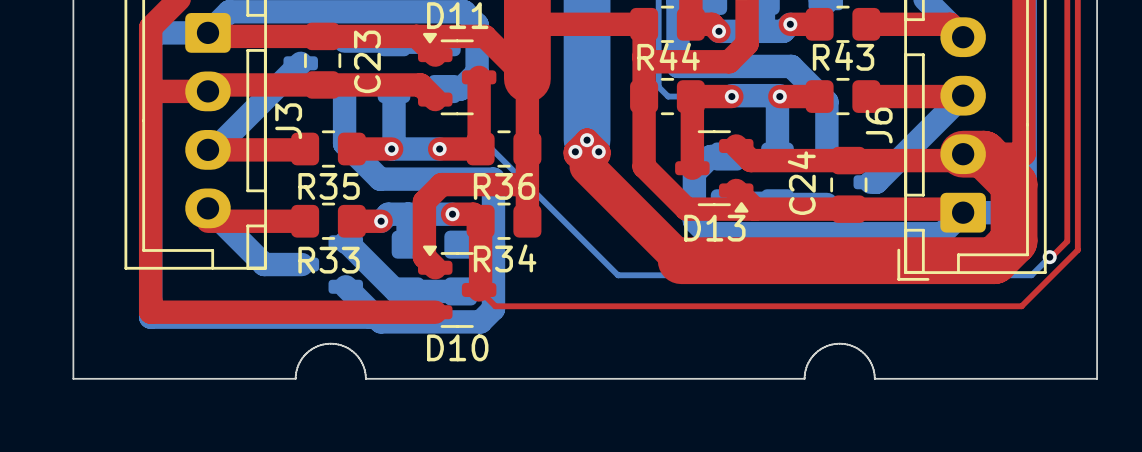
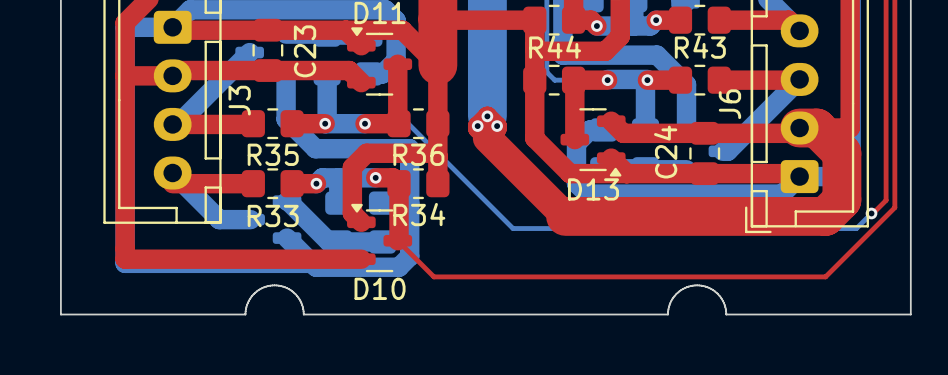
top track: (495, 306) (1021, 306) -> (411, 254) (433, 276) (825, 276) (848, 254)

